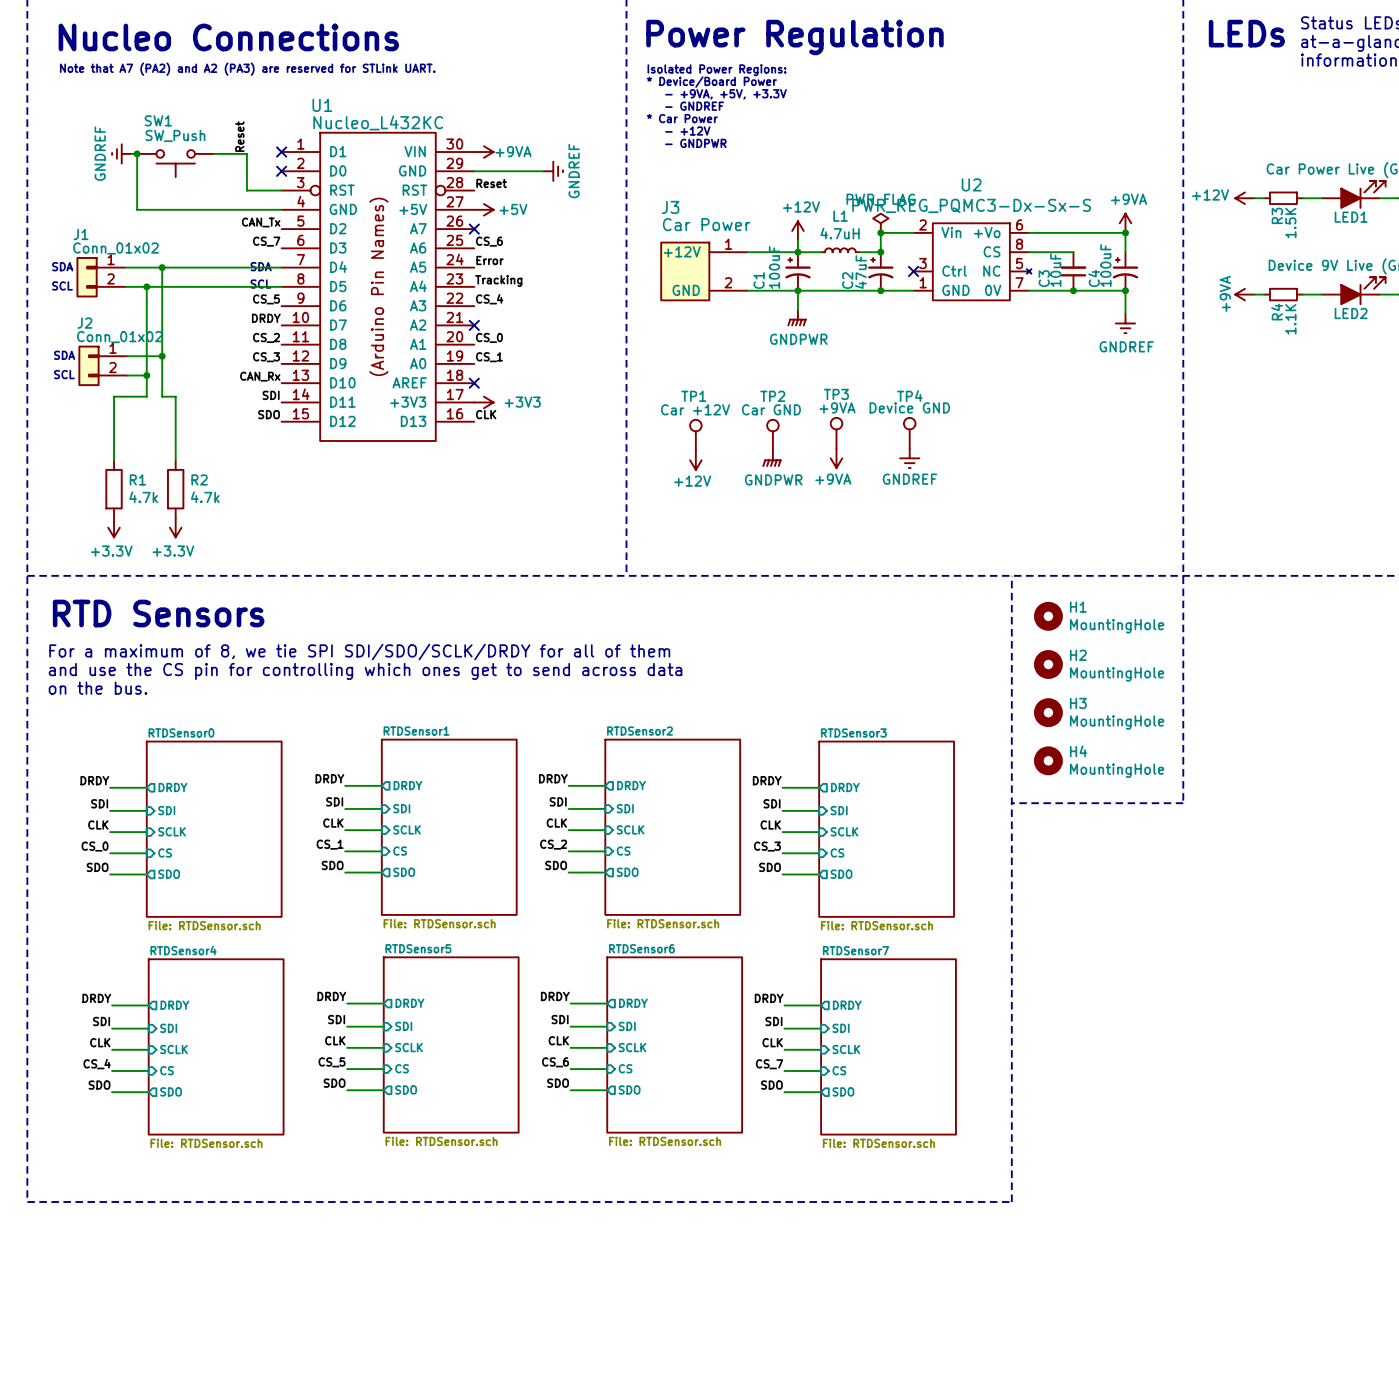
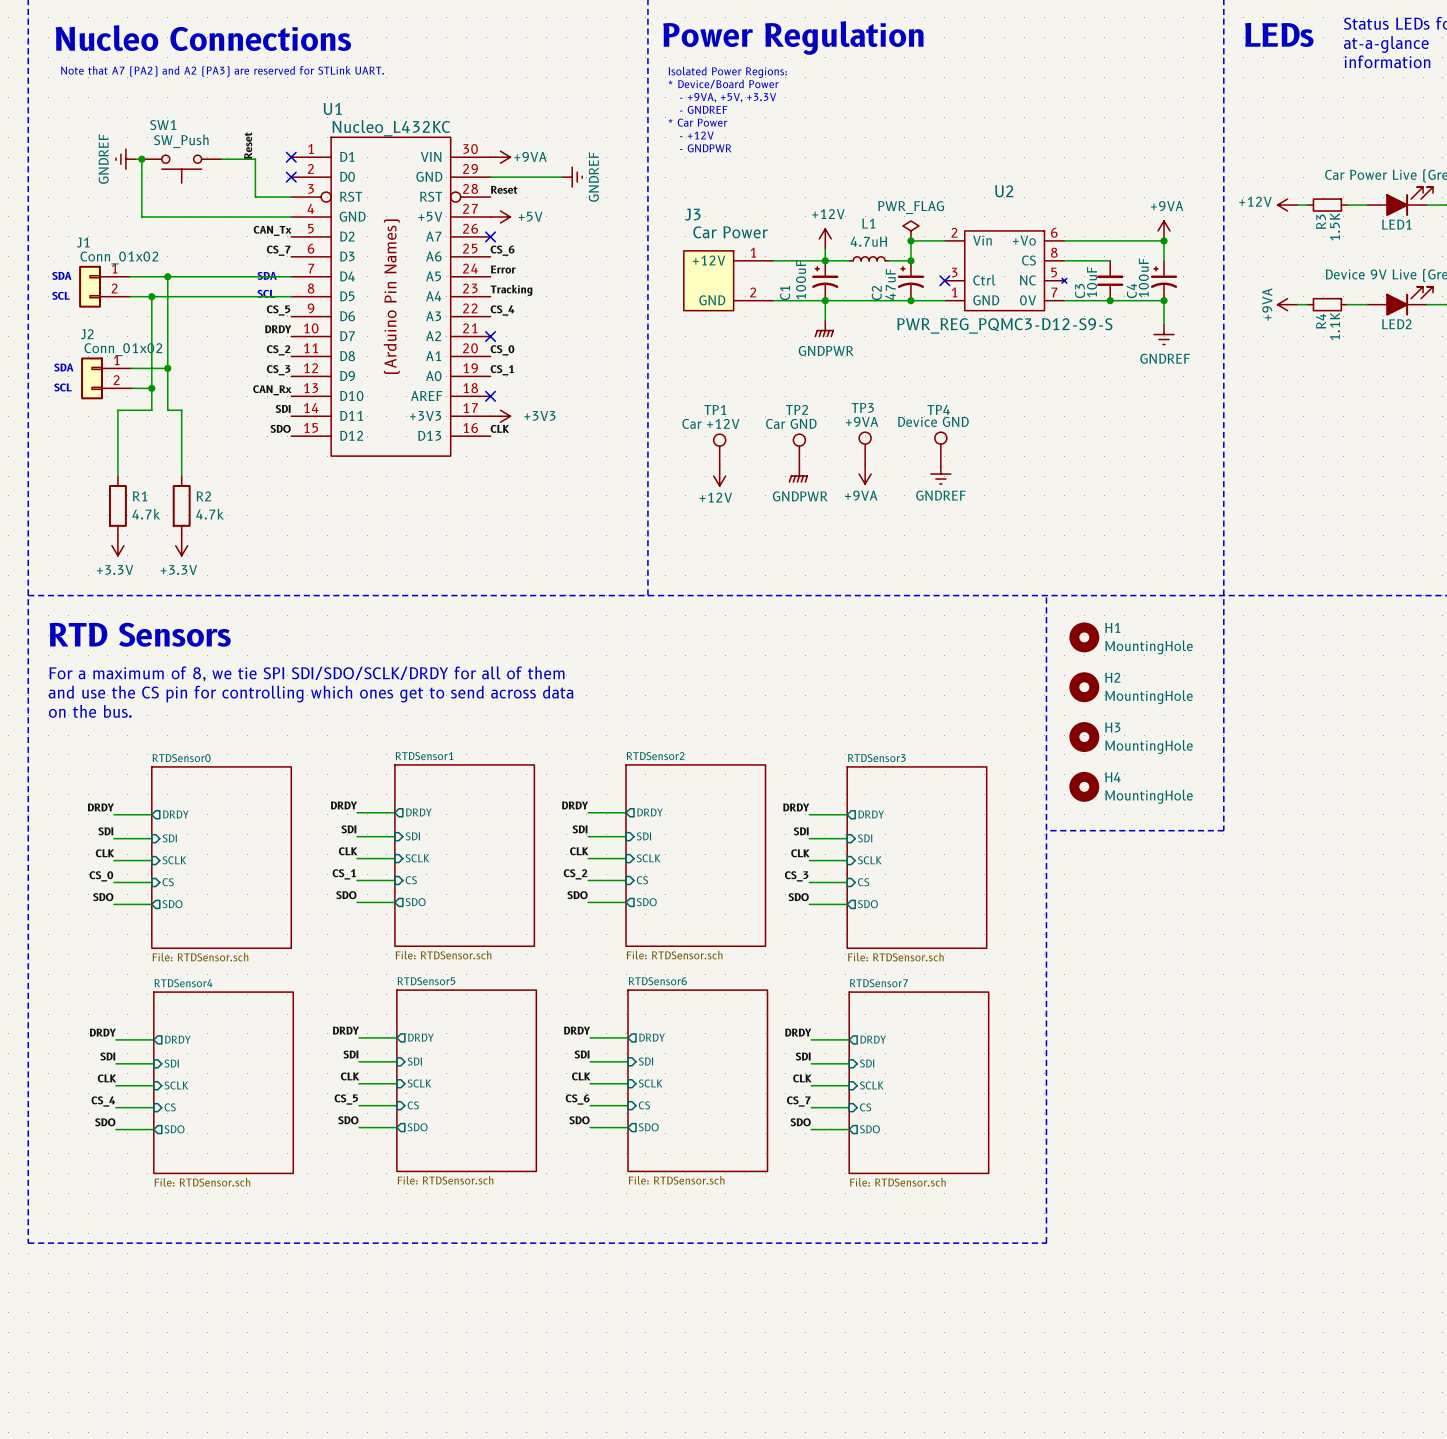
U2 value: PWR_REG_PQMC3-Dx-Sx-S (971, 205) -> PWR_REG_PQMC3-D12-S9-S (1004, 325)

